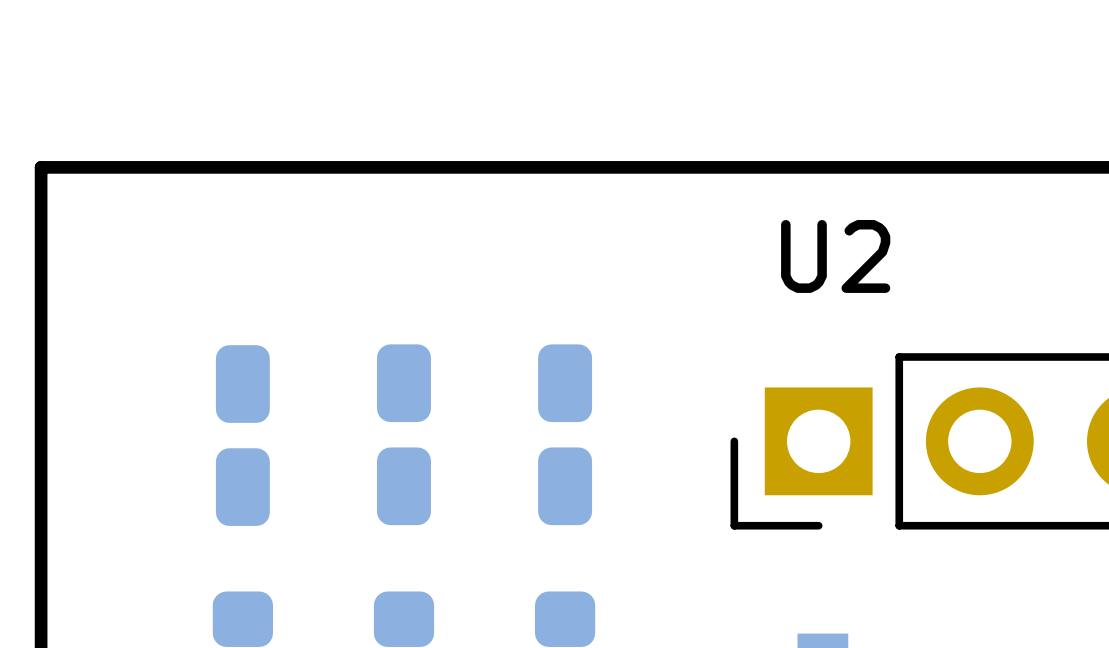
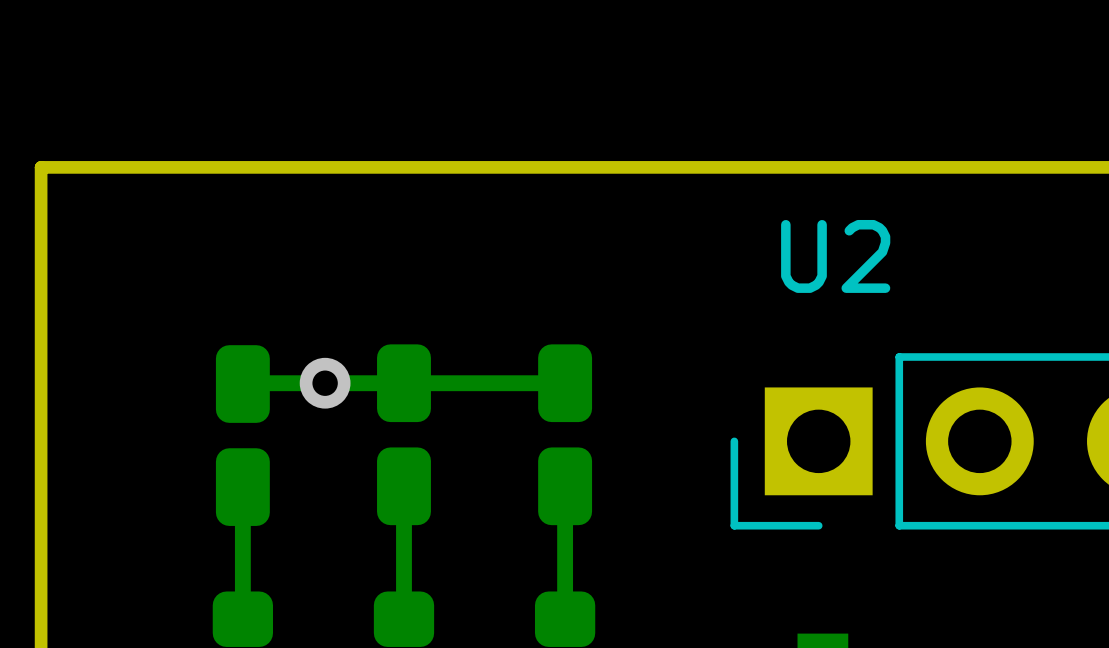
bottom track: none -> (243, 383) (565, 383)
via: none -> (325, 383)
bottom track: none -> (403, 486) (403, 619)
bottom track: none -> (565, 486) (565, 619)
bottom track: none -> (242, 487) (242, 619)

